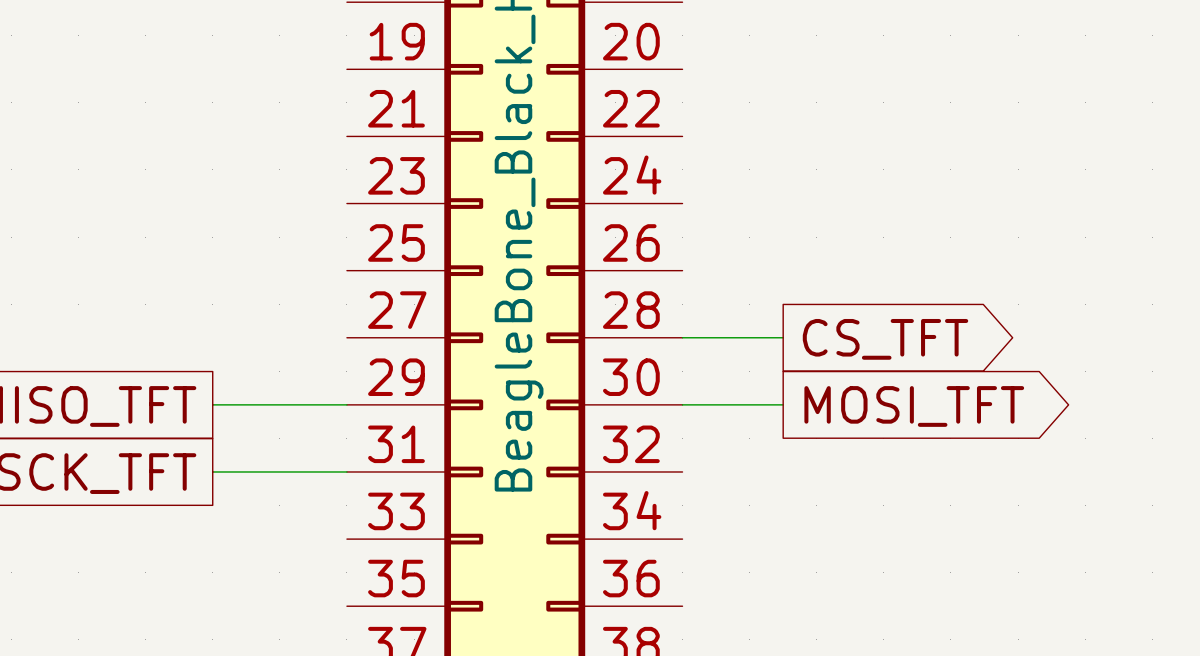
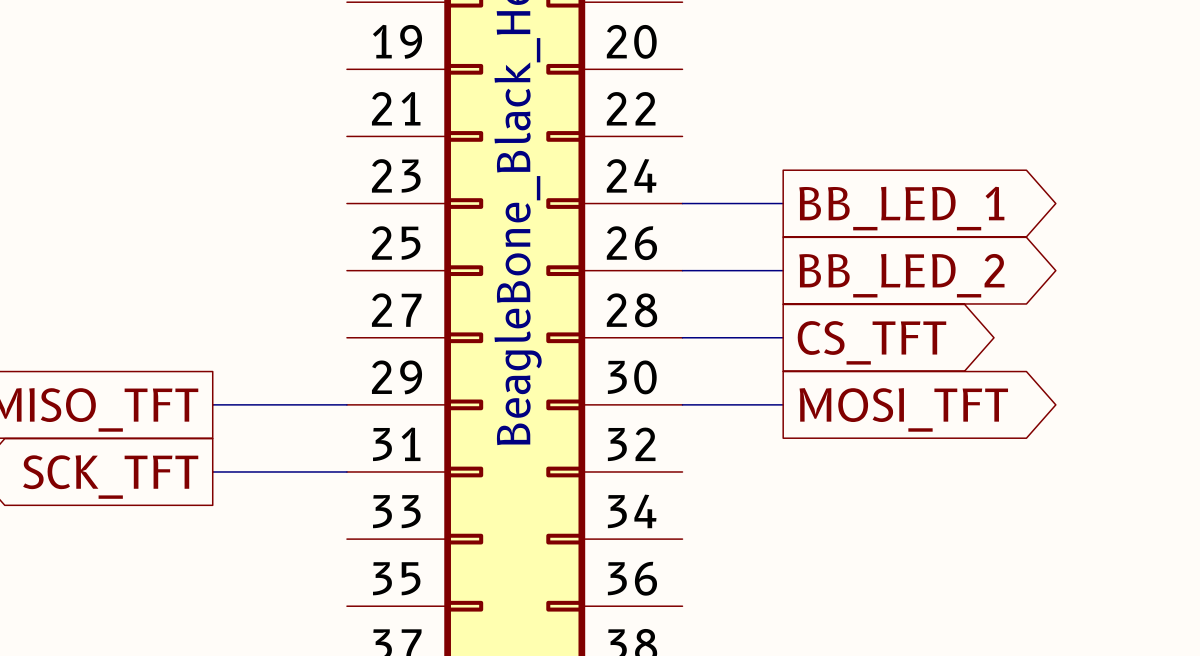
wire: none -> (682, 203) (783, 203)
global label: none -> BB_LED_1 (901, 208)
wire: none -> (682, 270) (783, 270)
global label: none -> BB_LED_2 (901, 275)

